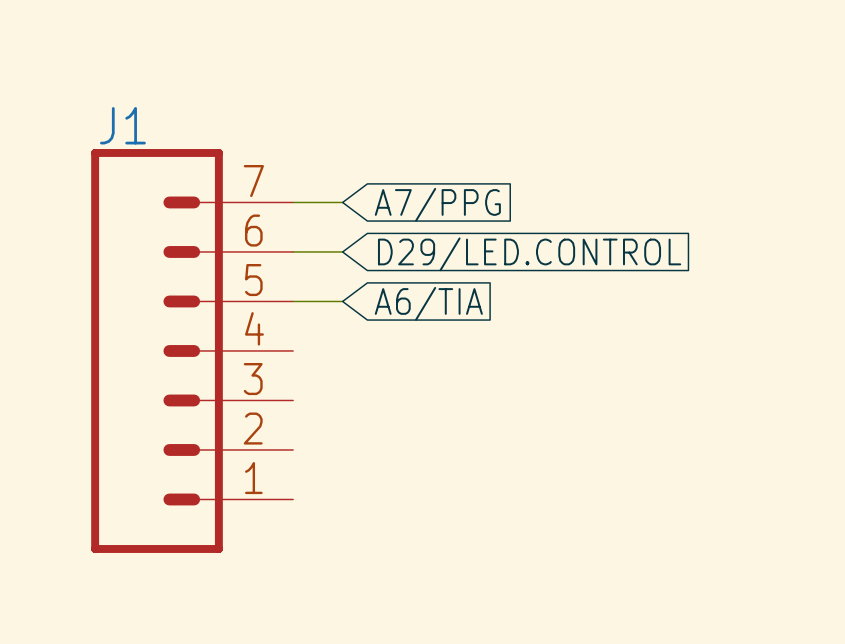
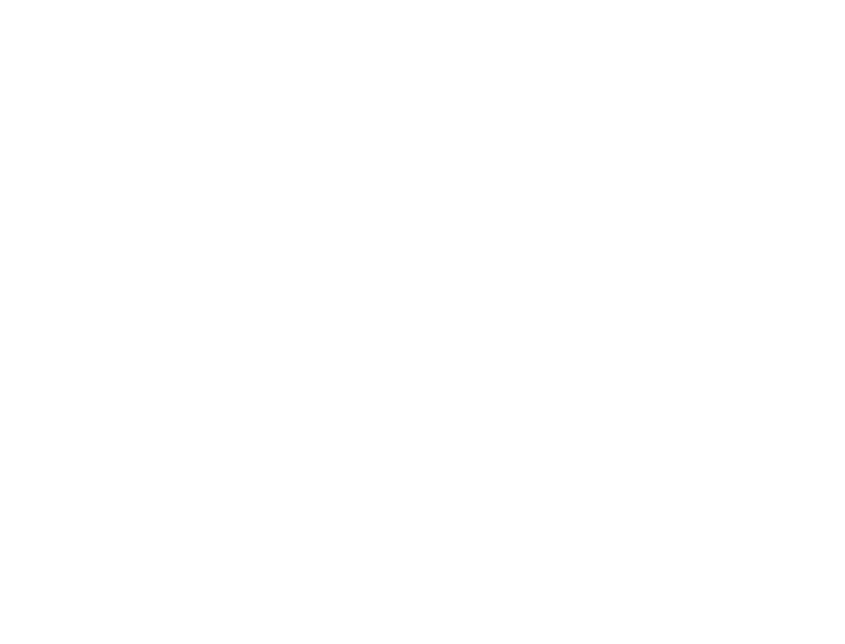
wire: (293, 202) (342, 202) -> none
global label: A7/PPG (437, 204) -> none
wire: (293, 251) (342, 251) -> none
global label: D29/LED.CONTROL (529, 254) -> none
wire: (293, 301) (342, 301) -> none
global label: A6/TIA (428, 303) -> none
J1: (192, 350) -> none

